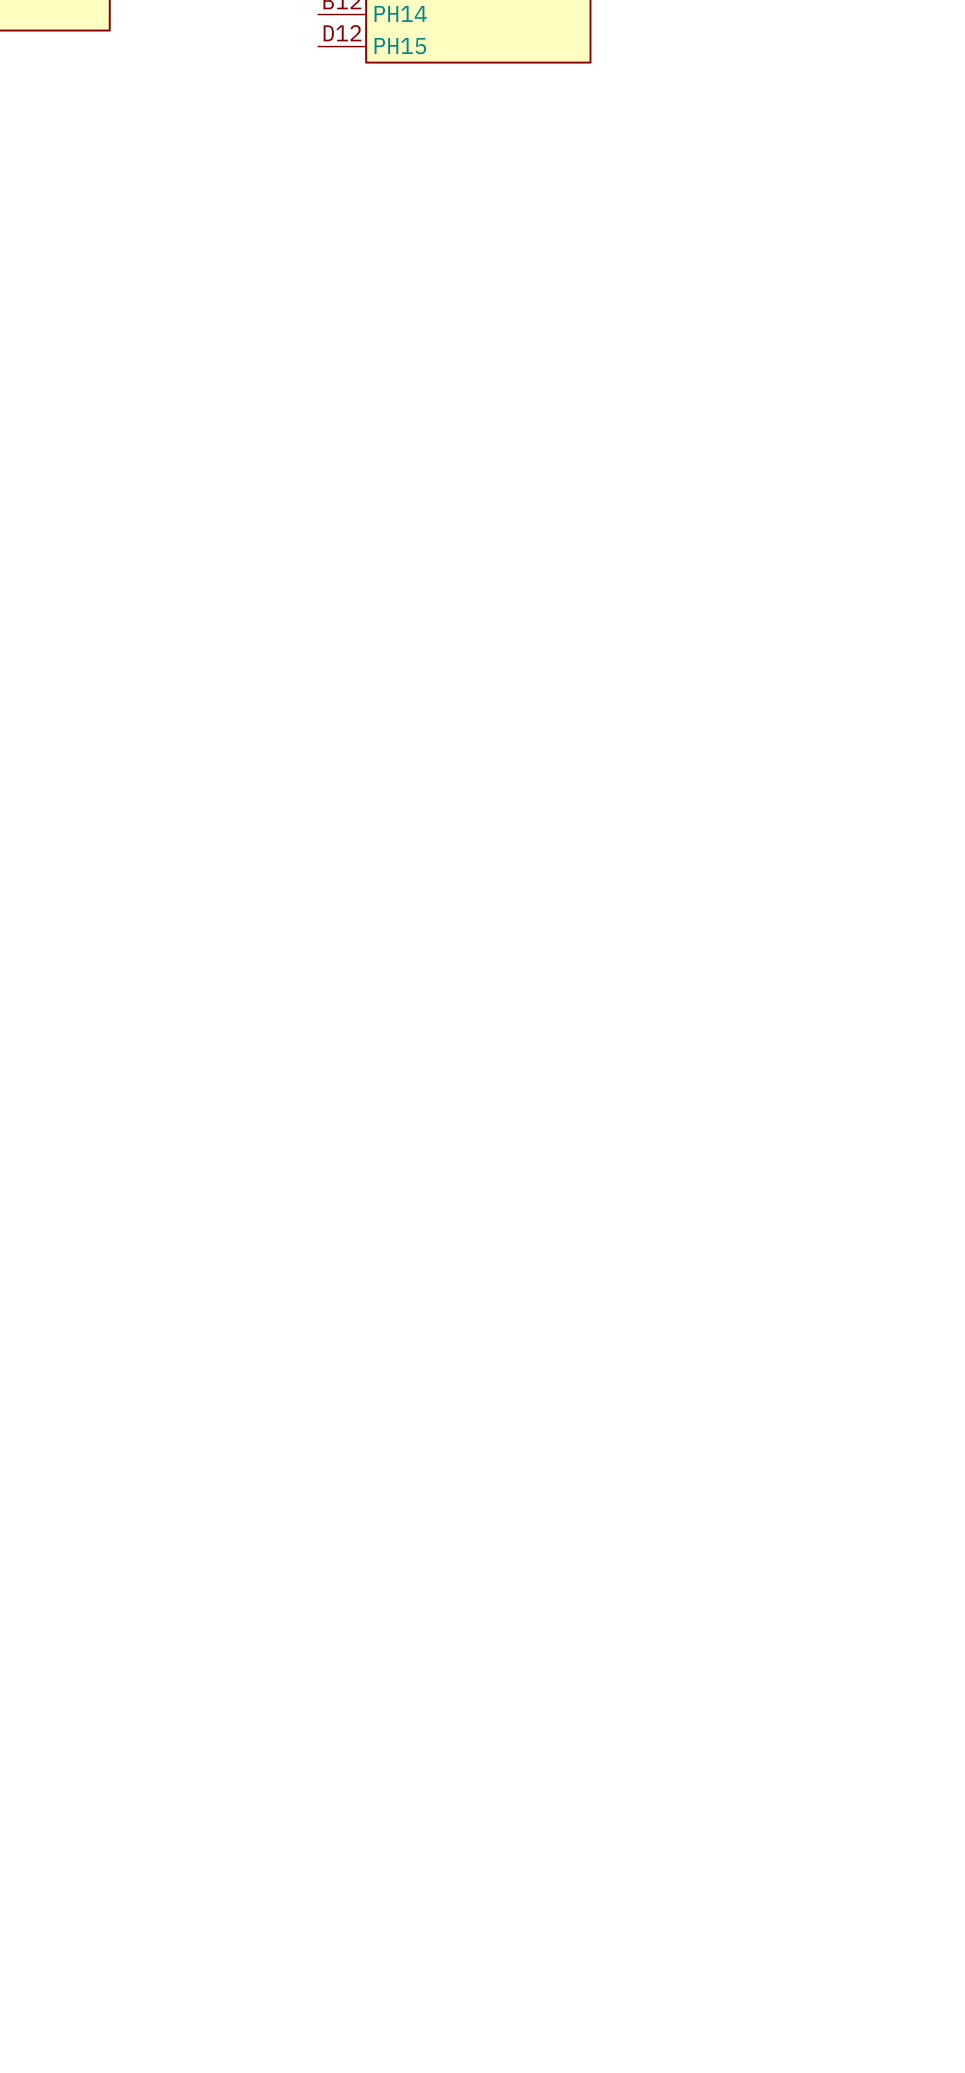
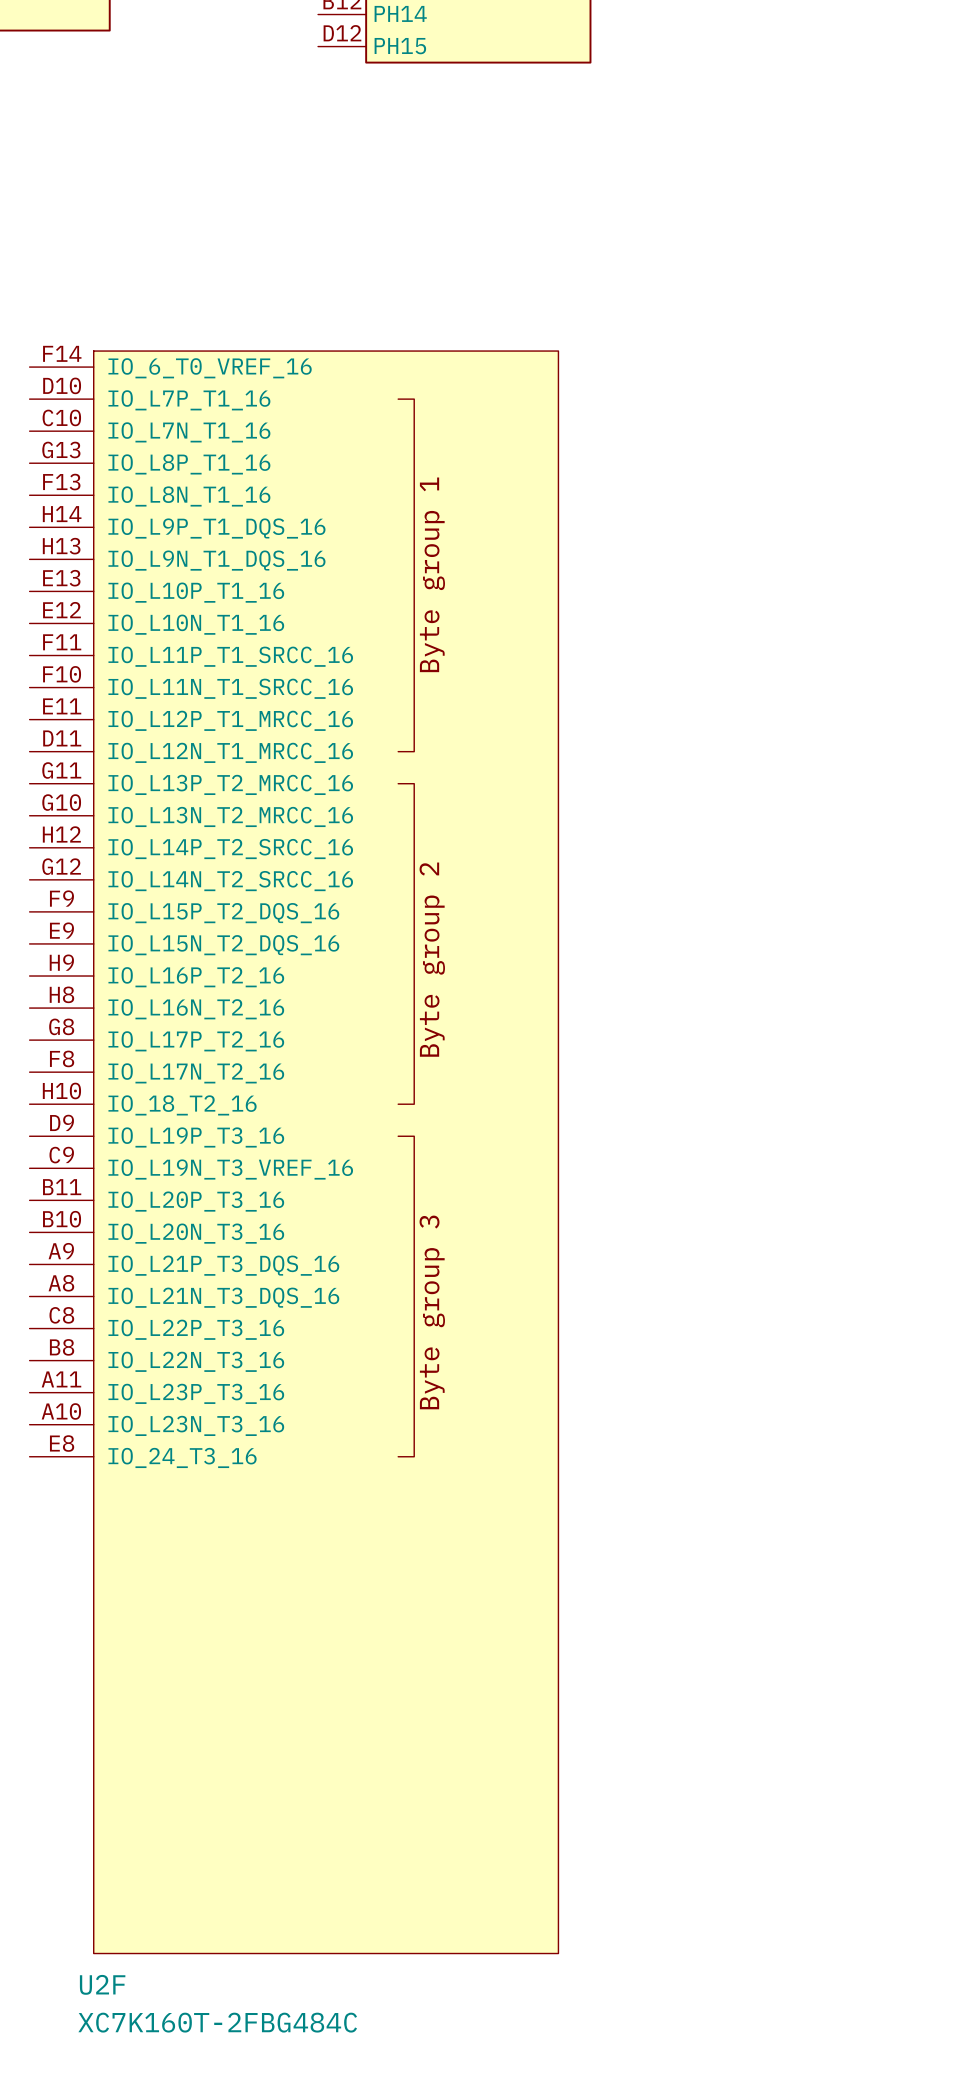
U2F: none -> XC7K160T-2FBG484C (294, 1152)

